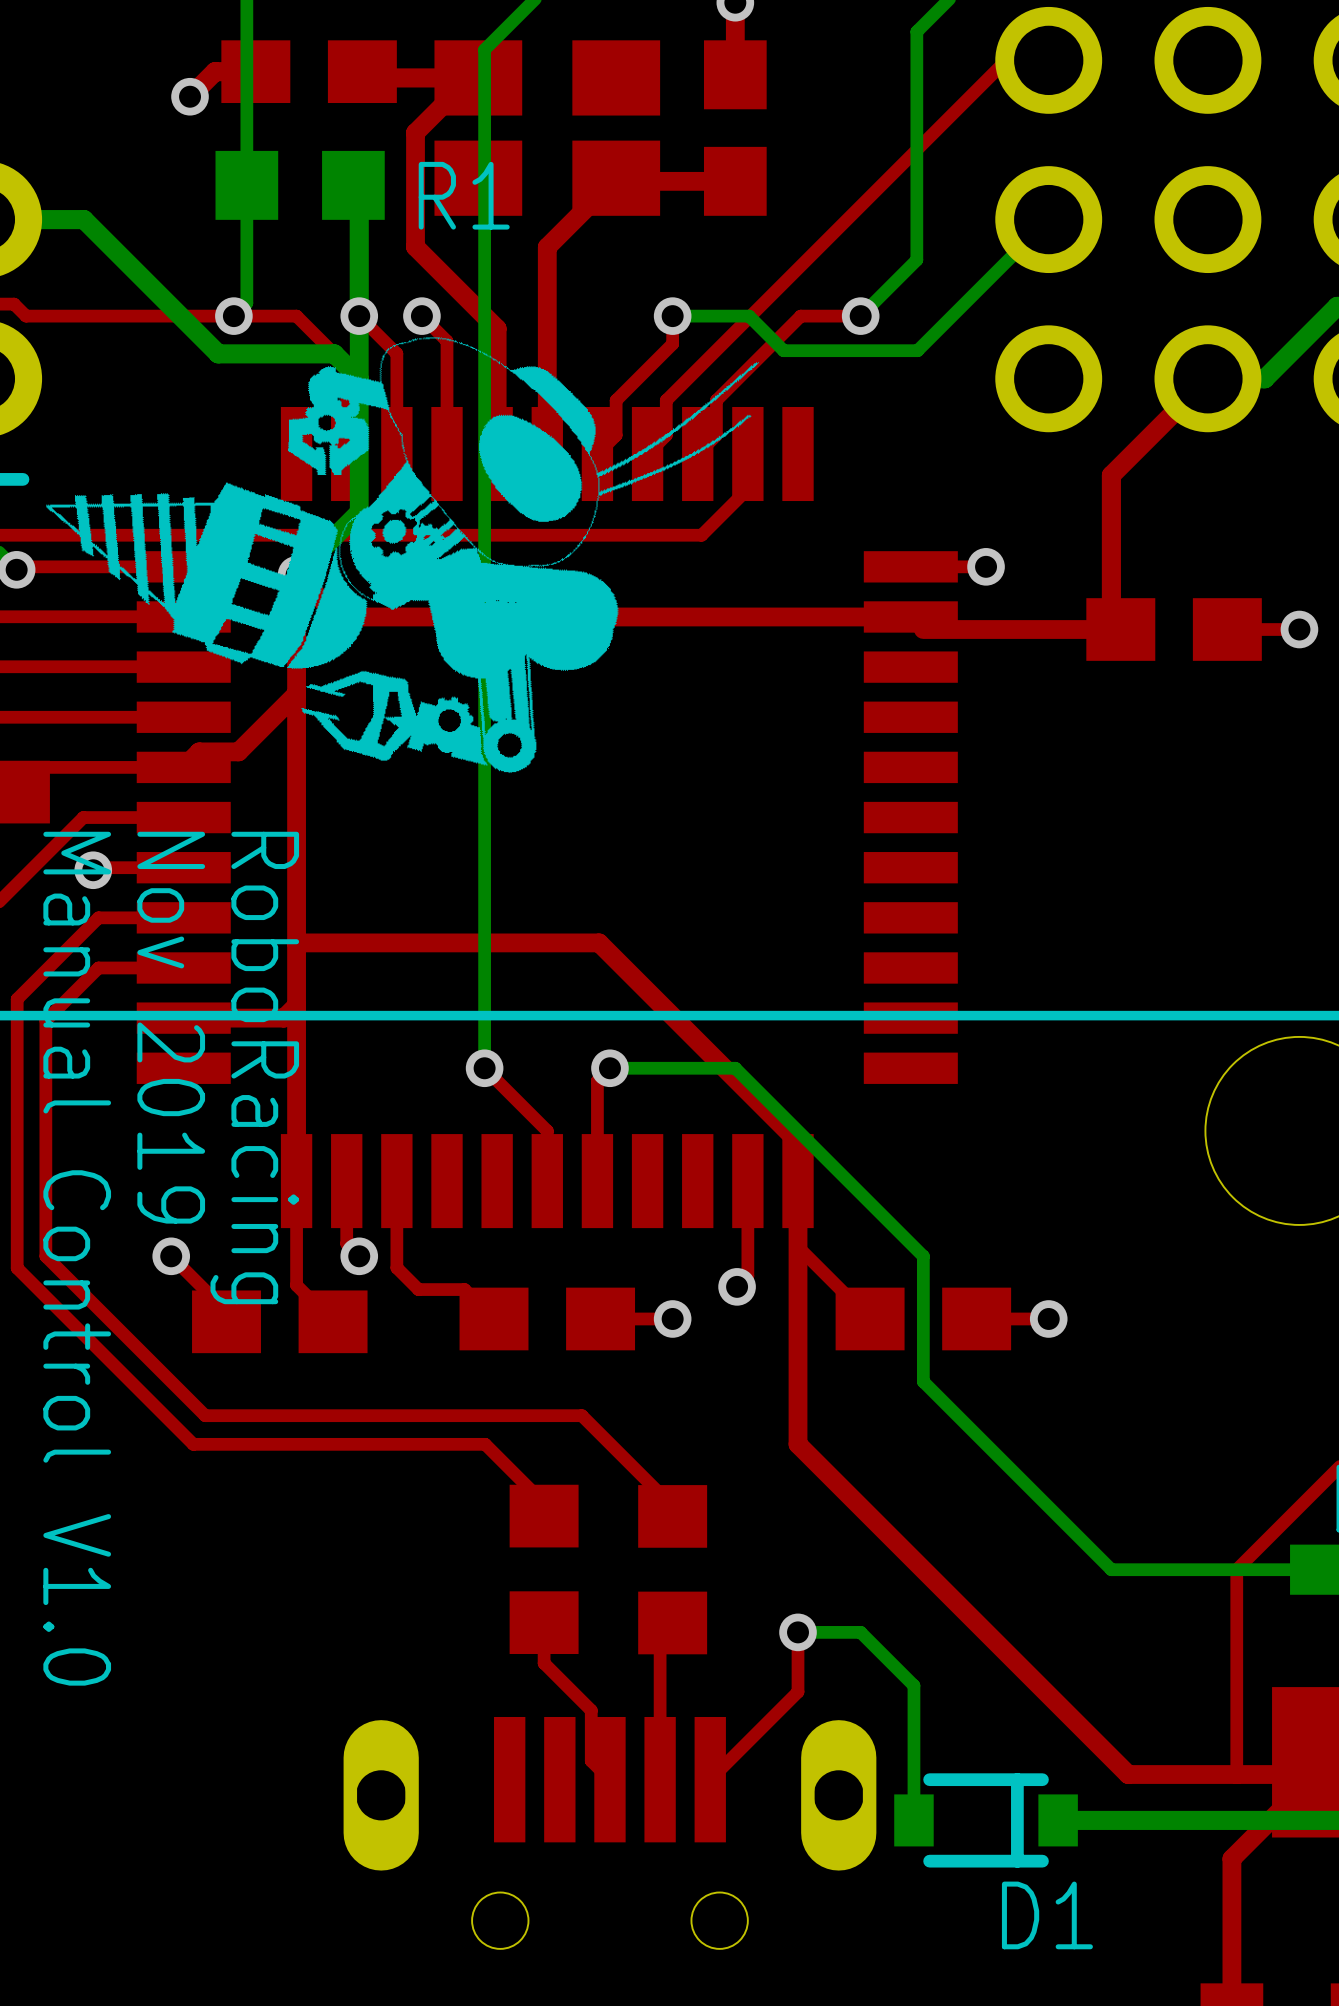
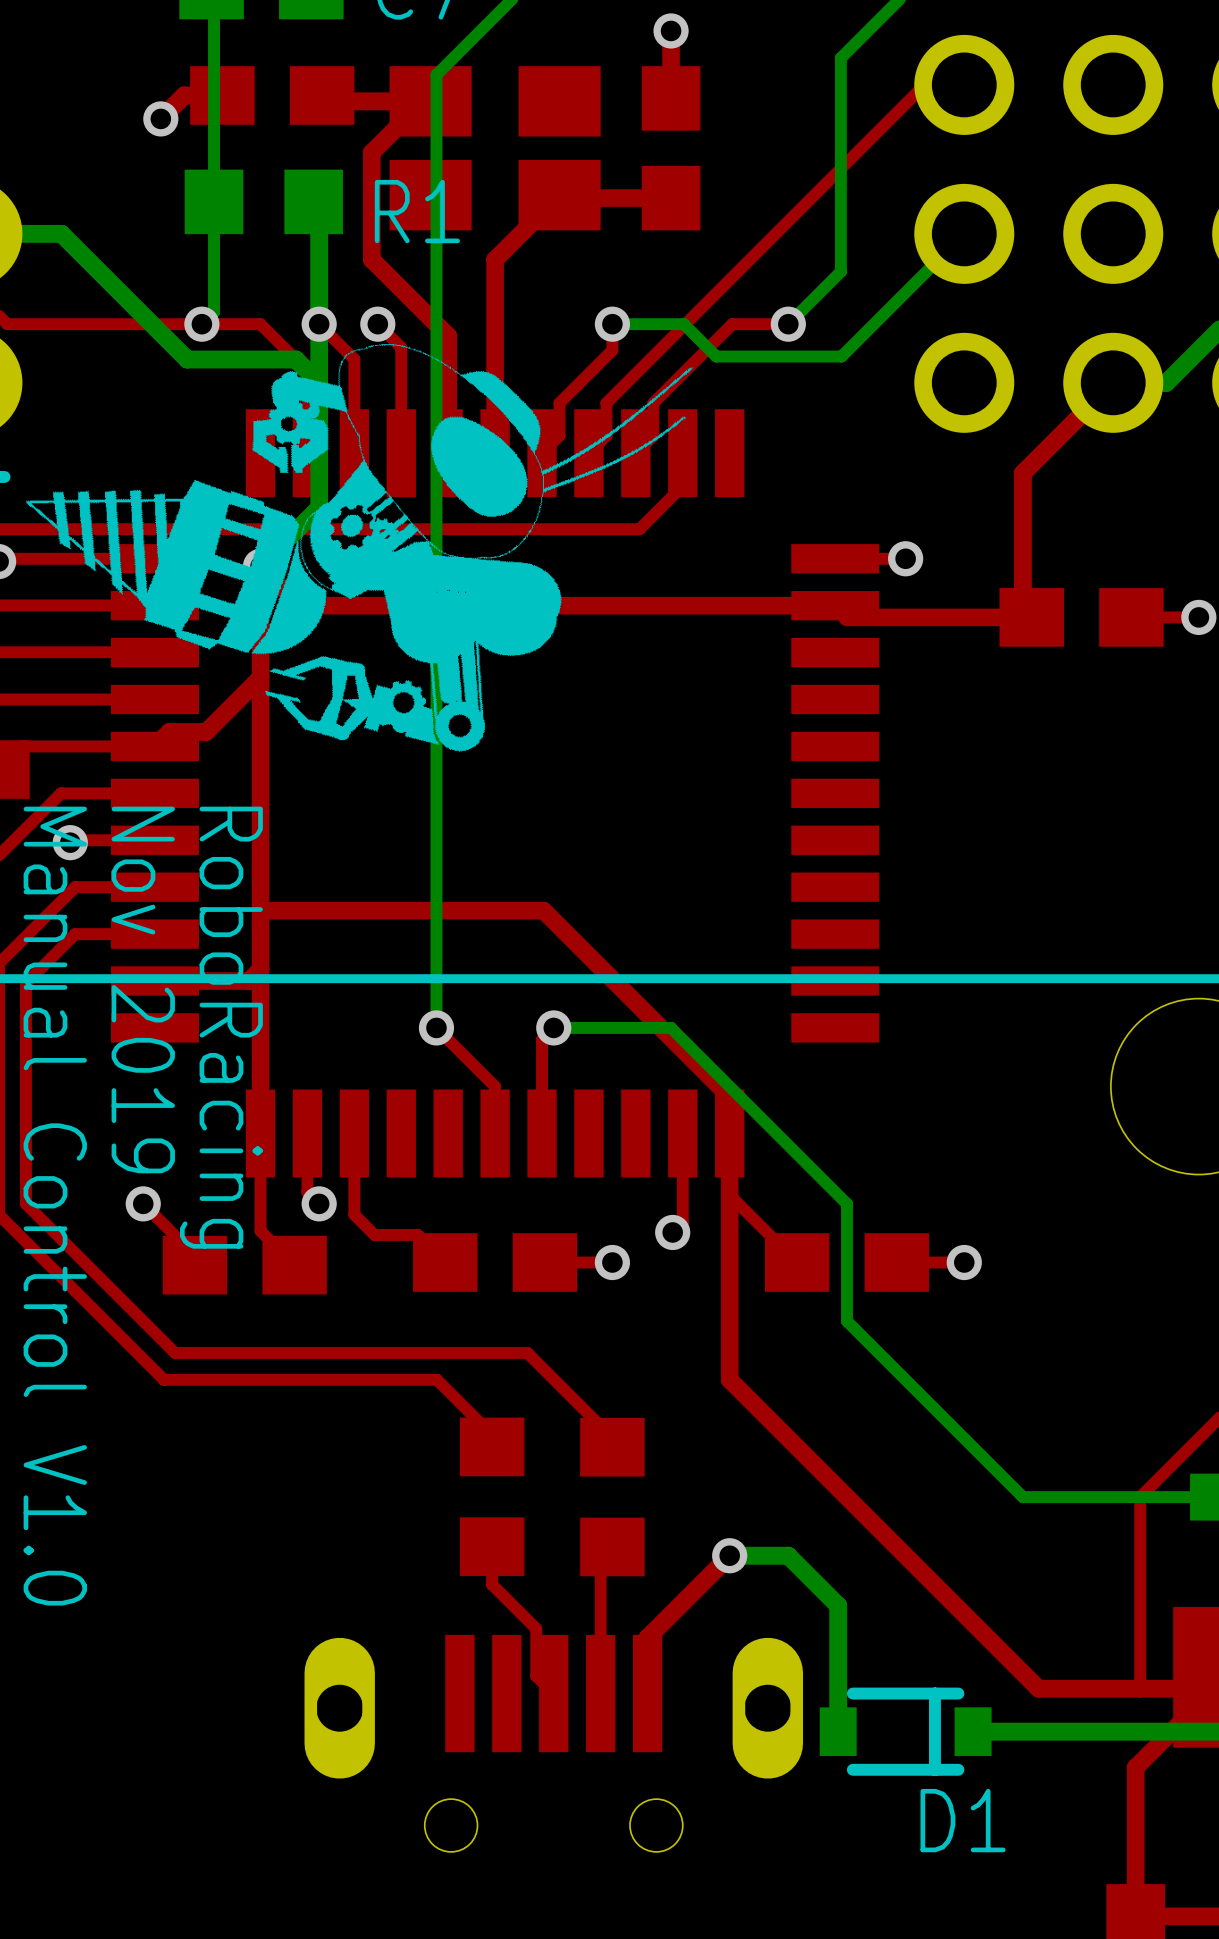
top track: (798, 1632) (798, 1691) (710, 1779) -> (729, 1555) (647, 1637) (647, 1693)
bottom track width: thin (798, 1632) (860, 1632) (913, 1685) (913, 1820) -> thick (729, 1555) (788, 1555) (838, 1605) (838, 1731)

